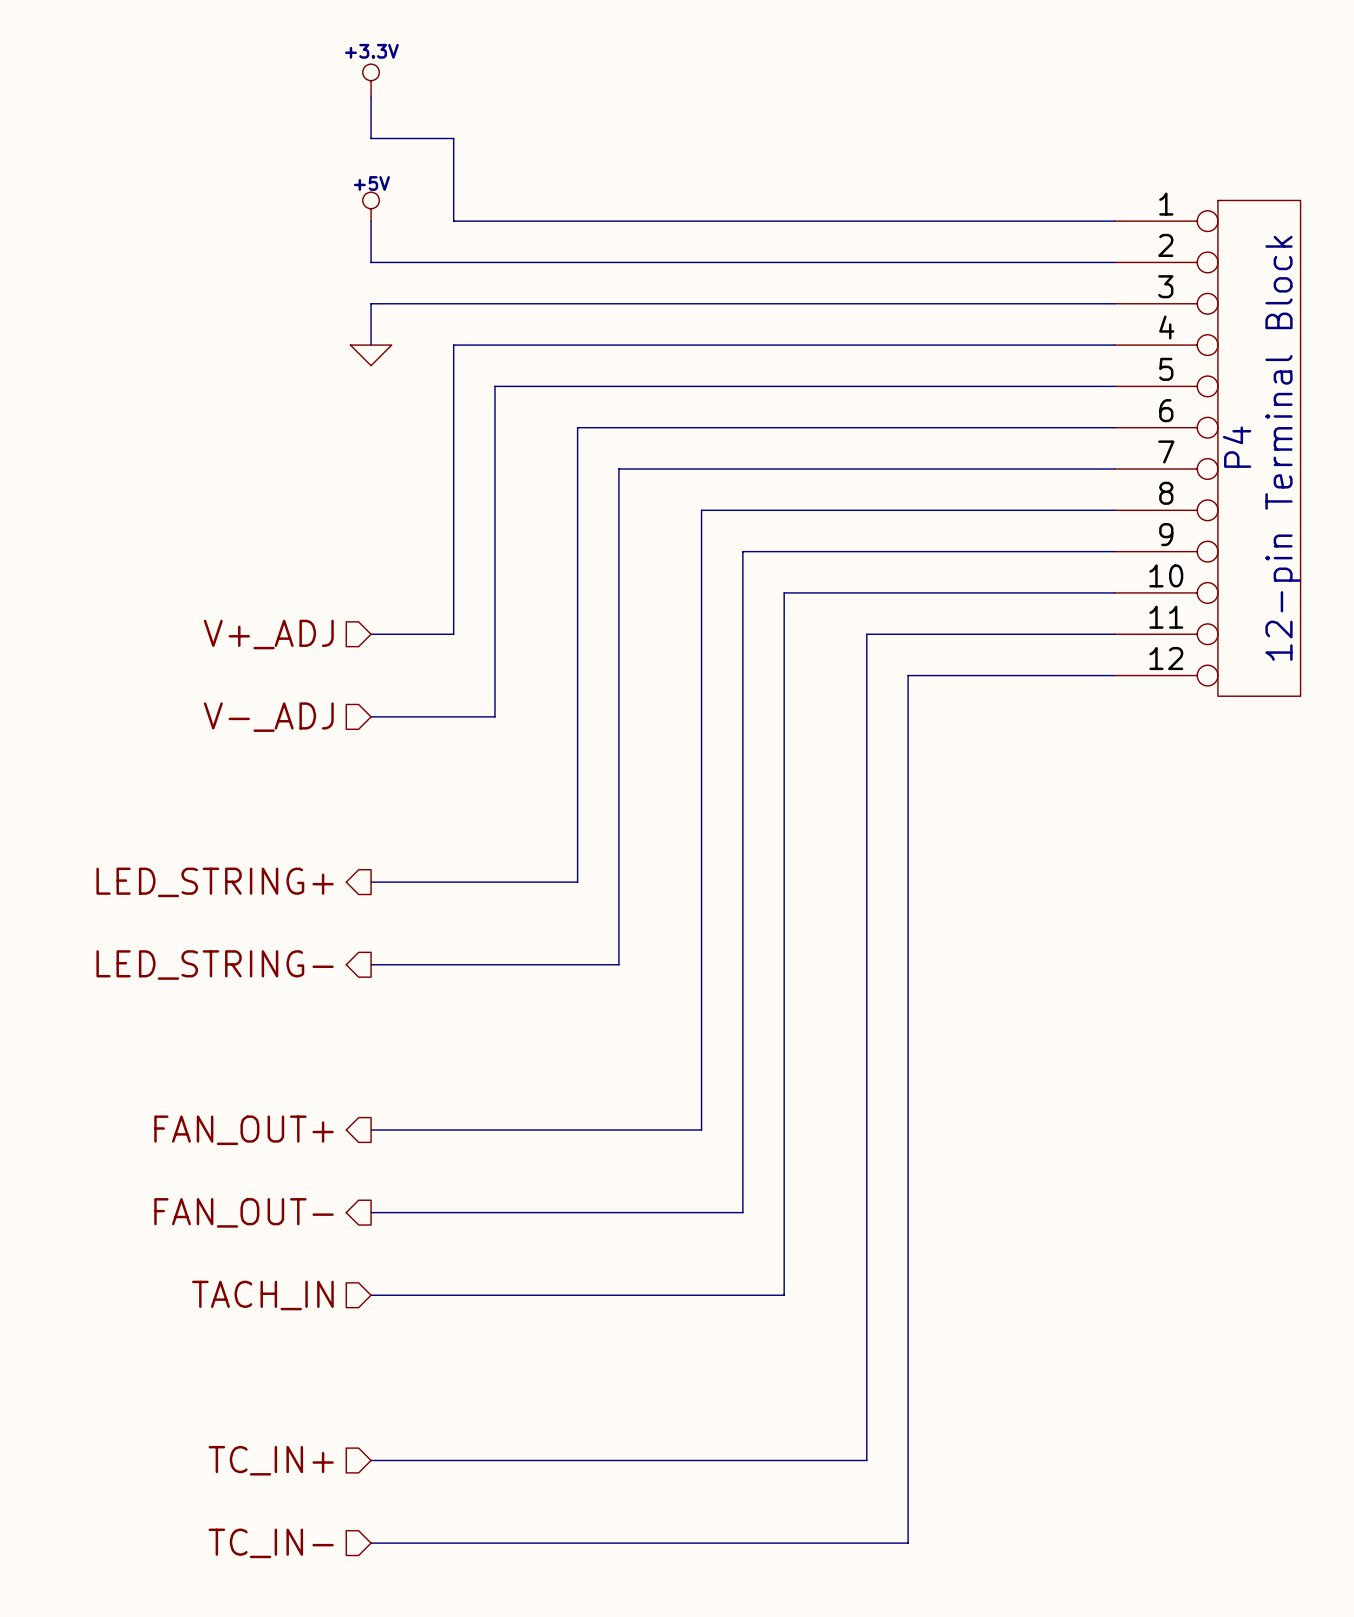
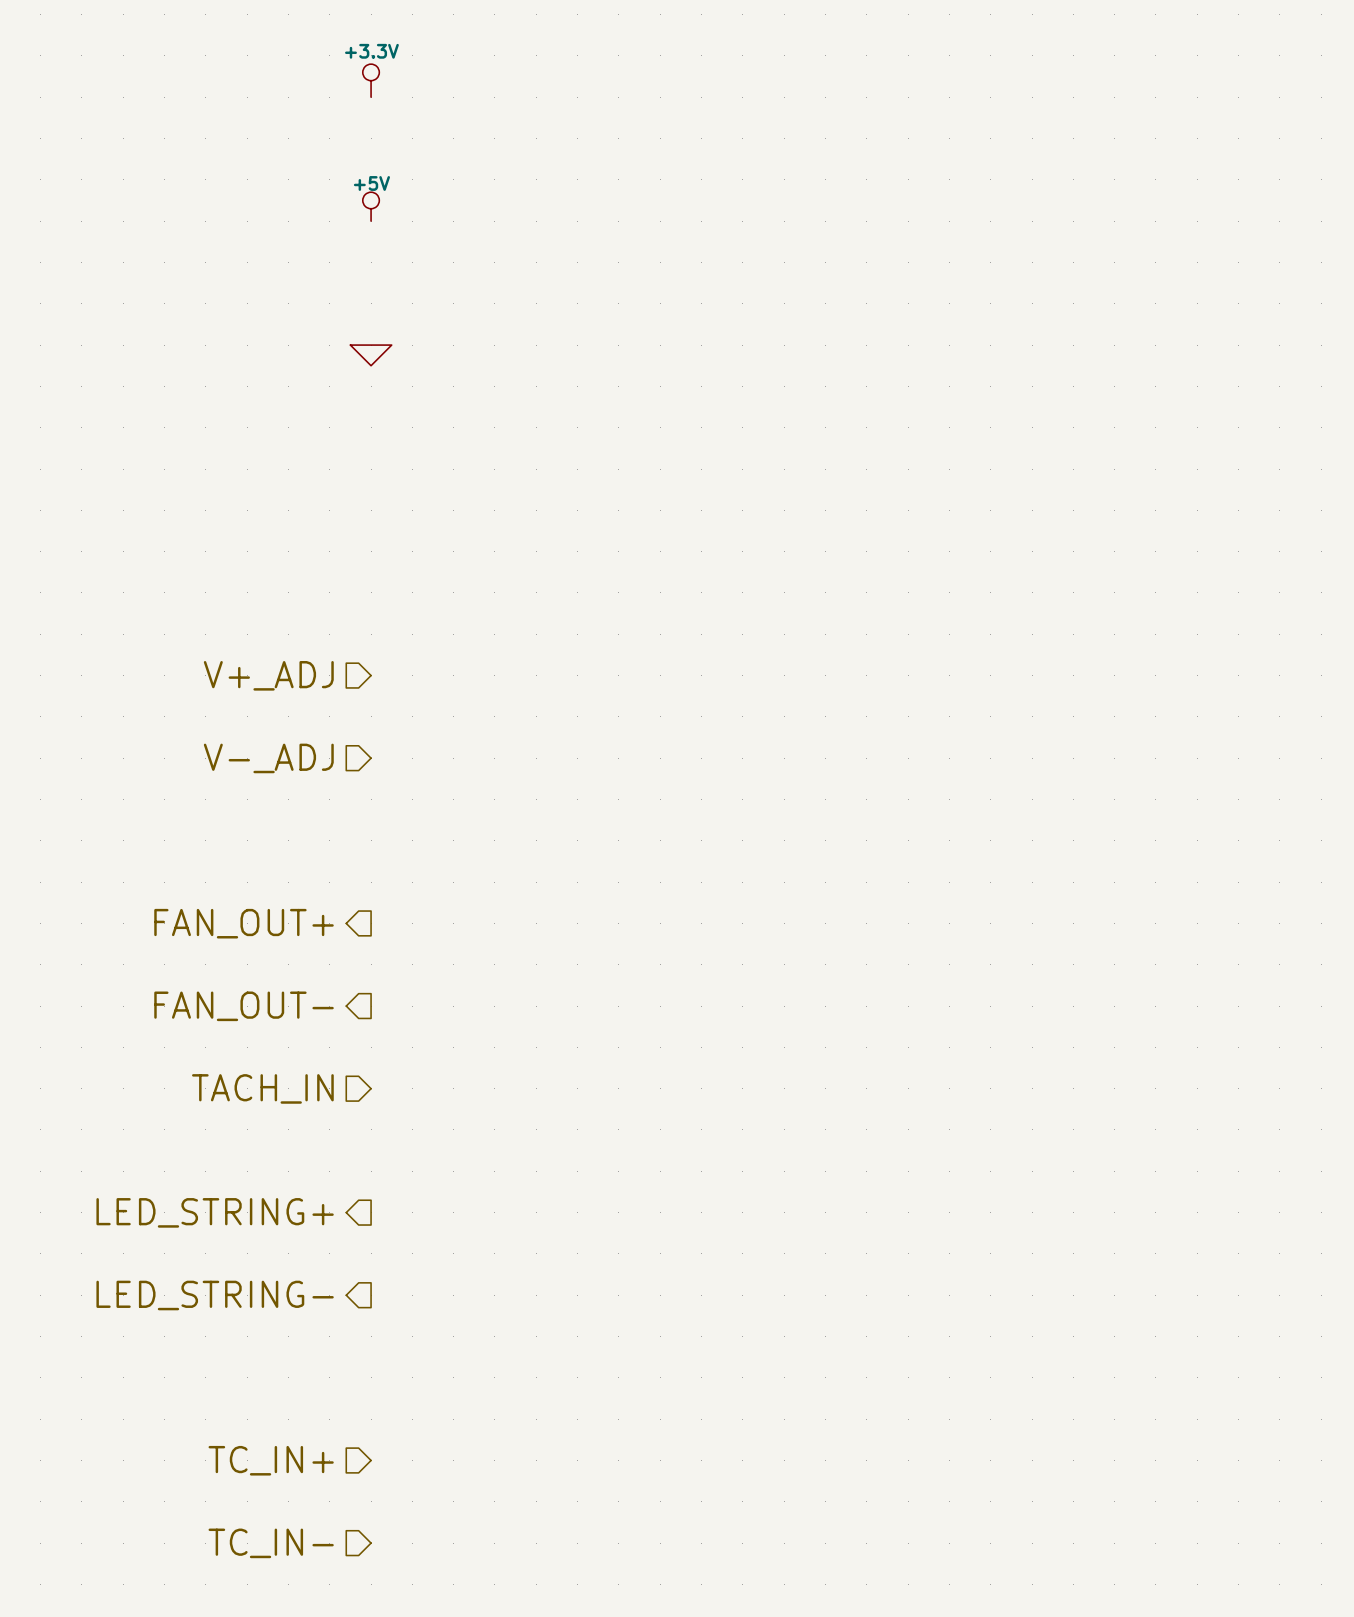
wire: (371, 97) (371, 138) (453, 138) (453, 221) (1114, 221) -> none
wire: (371, 221) (371, 262) (1114, 262) -> none
wire: (1114, 303) (371, 303) (371, 345) -> none
wire: (1114, 345) (453, 345) (453, 634) (371, 634) -> none
wire: (1114, 386) (494, 386) (494, 716) (371, 716) -> none
wire: (1114, 427) (577, 427) (577, 882) (371, 882) -> none
P4: 12-pin Terminal Block (1207, 448) -> none
wire: (1114, 469) (618, 469) (618, 964) (371, 964) -> none
wire: (1114, 510) (701, 510) (701, 1129) (371, 1129) -> none
wire: (1114, 551) (742, 551) (742, 1212) (371, 1212) -> none
wire: (1114, 592) (784, 592) (784, 1295) (371, 1295) -> none
hierarchical label position: V+_ADJ (268, 634) -> V+_ADJ (268, 675)
wire: (1114, 634) (866, 634) (866, 1460) (371, 1460) -> none
wire: (1114, 675) (908, 675) (908, 1543) (371, 1543) -> none
hierarchical label position: V-_ADJ (268, 717) -> V-_ADJ (268, 758)
hierarchical label: LED_STRING+ (215, 882) -> none
hierarchical label: LED_STRING- (215, 965) -> none
hierarchical label: none -> FAN_OUT- (244, 1006)
hierarchical label: none -> TACH_IN (262, 1088)
hierarchical label position: FAN_OUT+ (244, 1130) -> FAN_OUT+ (244, 923)
hierarchical label: FAN_OUT- (244, 1212) -> LED_STRING+ (215, 1212)
hierarchical label shape: input (262, 1295) -> output (215, 1295)
hierarchical label: TACH_IN (262, 1295) -> LED_STRING- (215, 1295)

